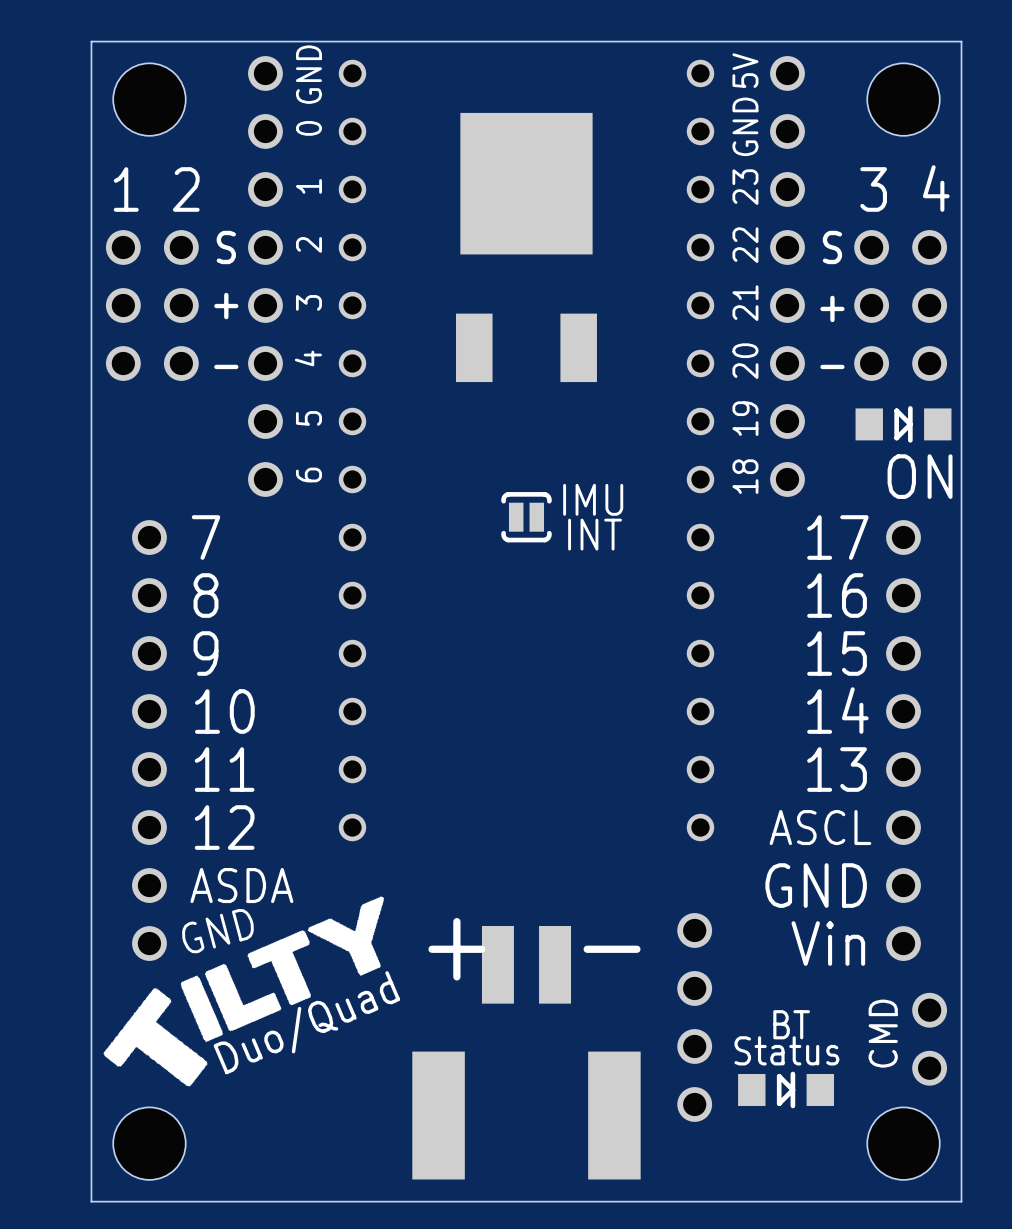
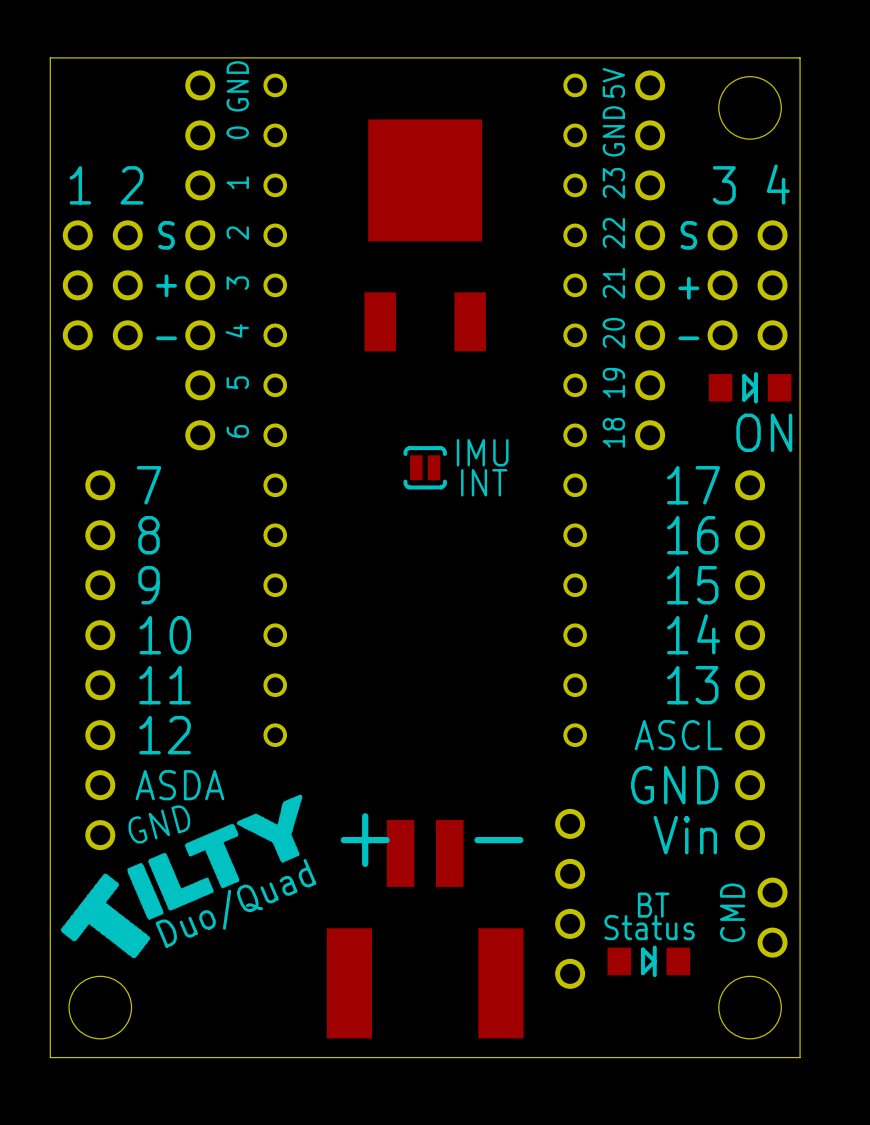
hole: (149, 99) -> none

